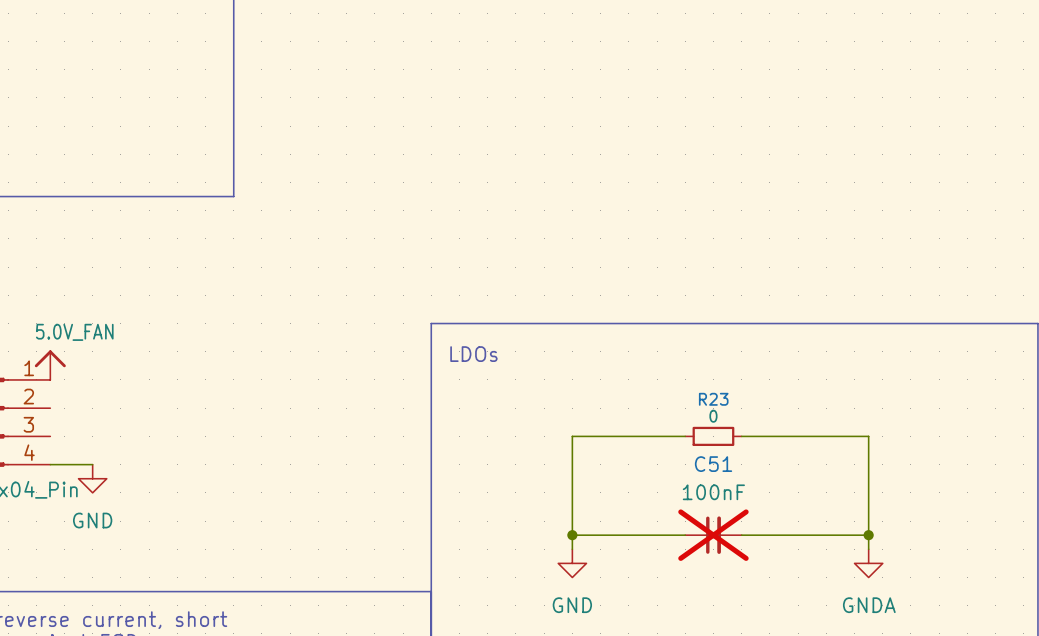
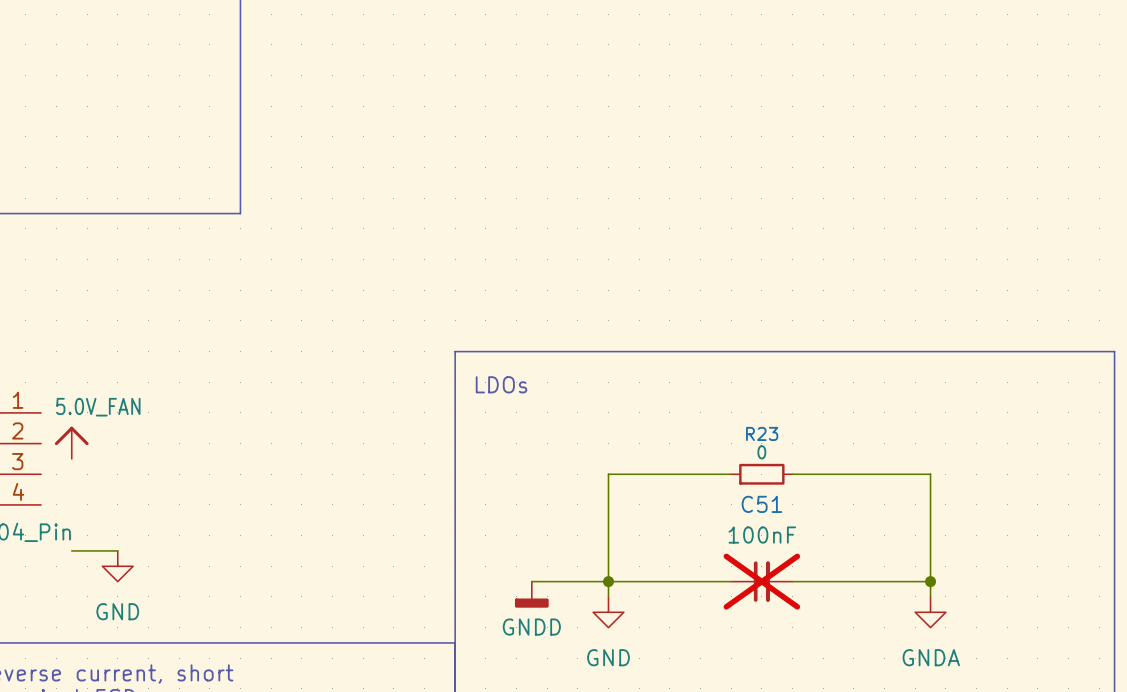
power symbol position: 5.0V_FAN (50, 365) -> 5.0V_FAN (71, 442)
wire: (50, 464) (92, 464) -> (71, 550) (117, 550)
power symbol position: GND (92, 478) -> GND (117, 566)
wire: none -> (531, 581) (608, 581)
power symbol: none -> GNDD (531, 594)

